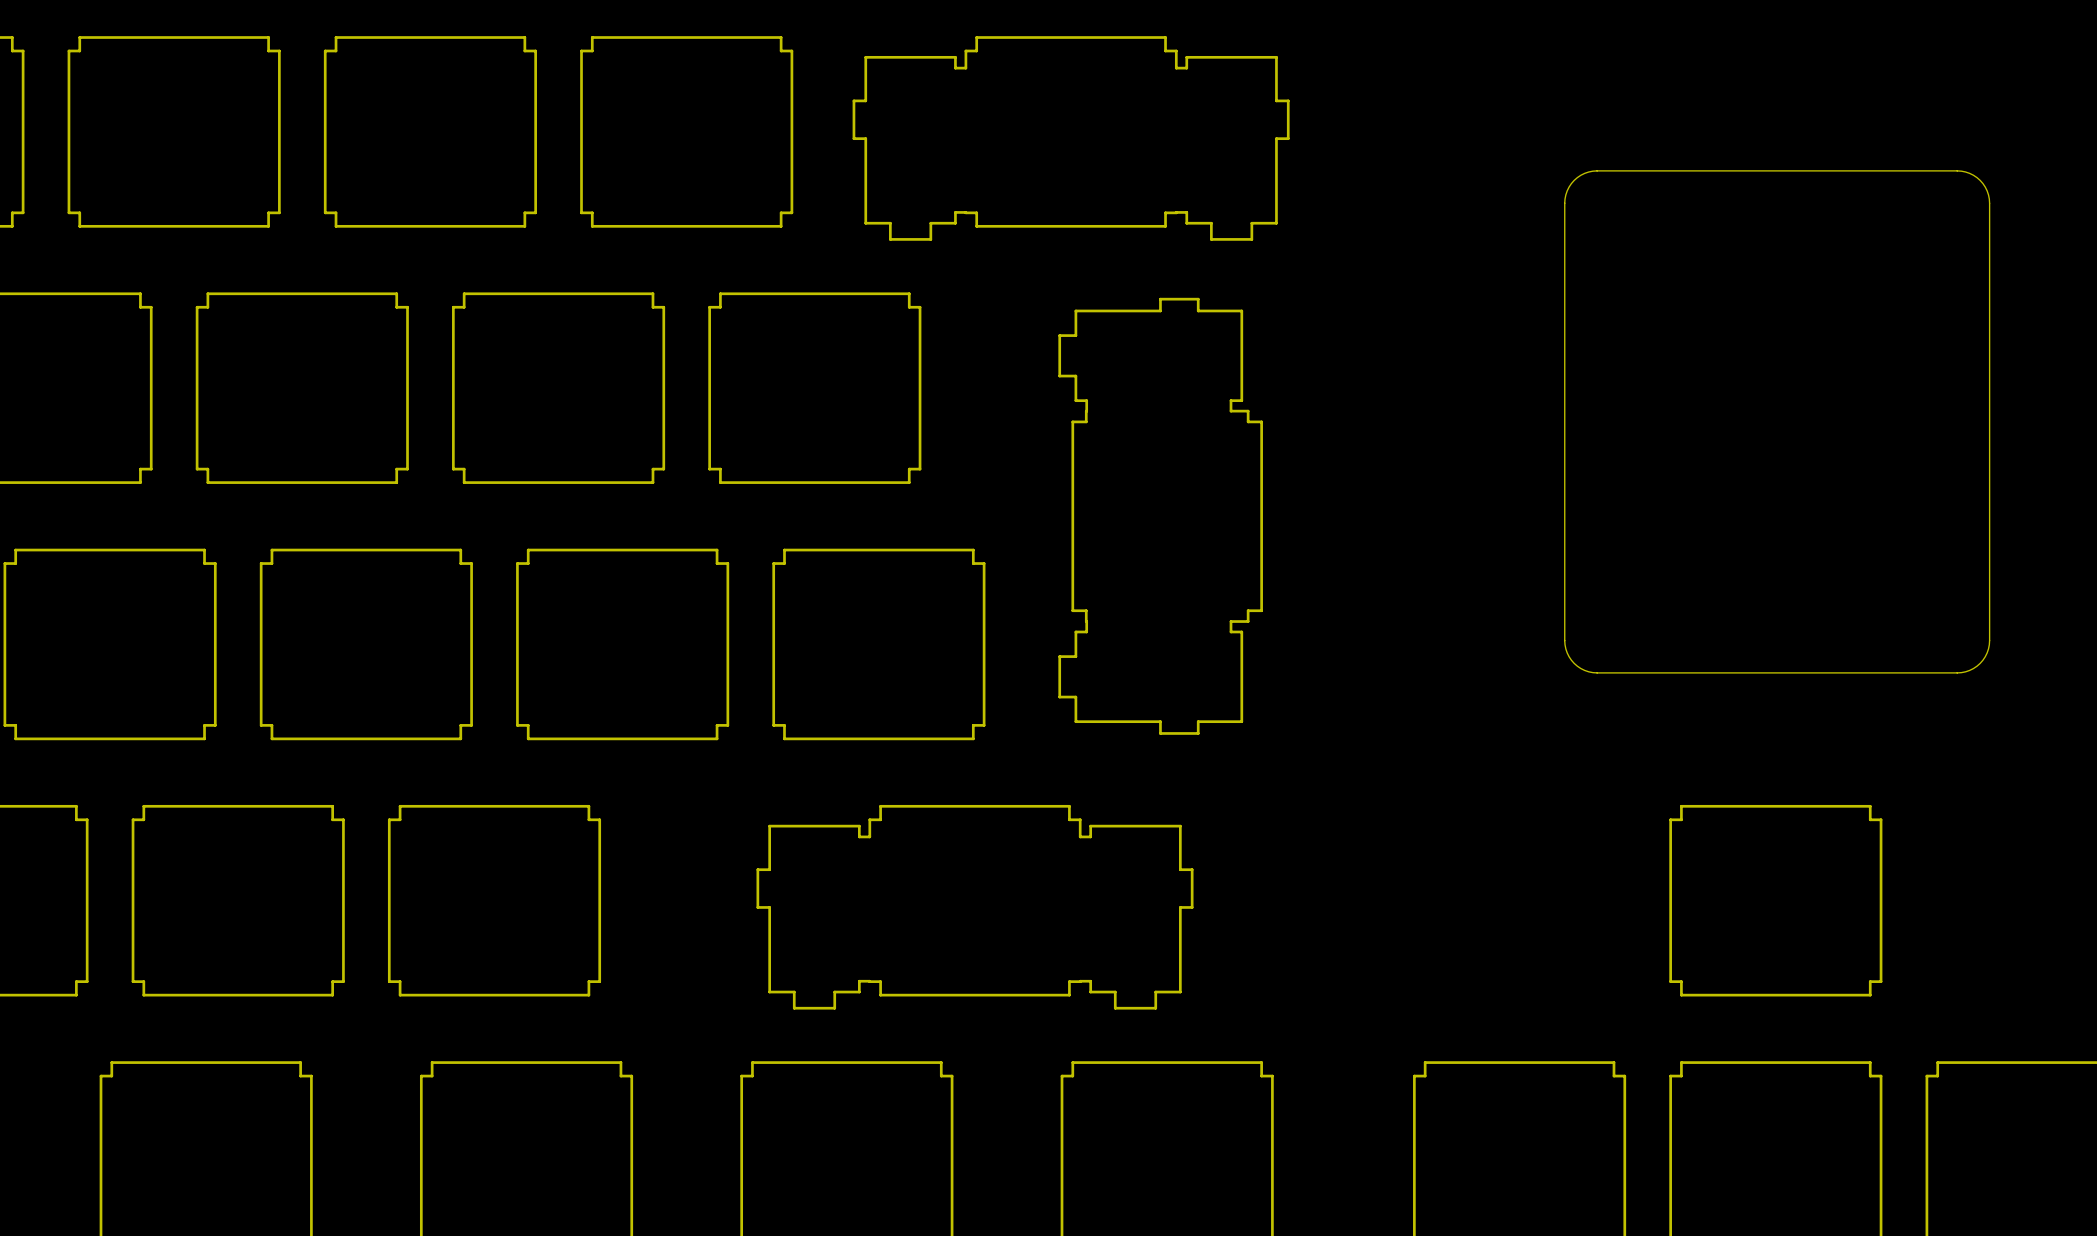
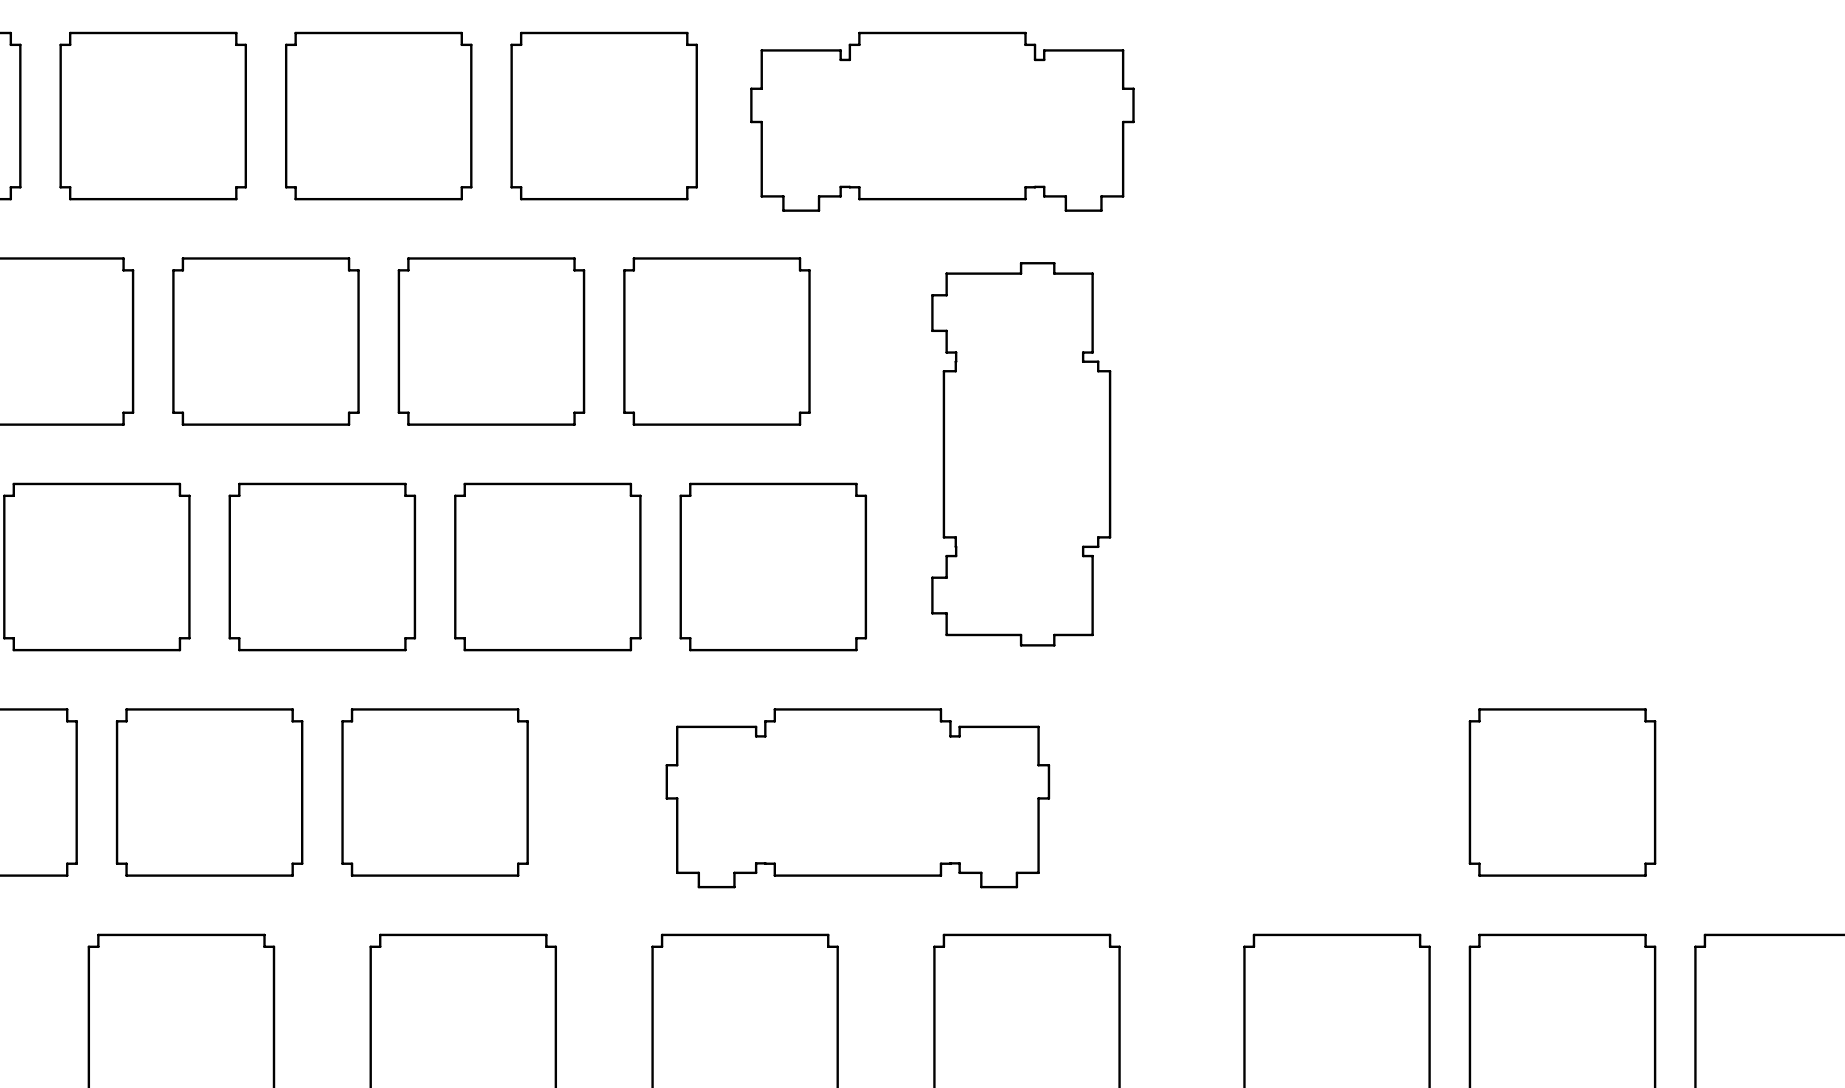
board edge: (1597, 170) (1957, 170) (1973, 175) (1982, 183) (1987, 190) (1989, 203) (1989, 640) (1985, 656) (1976, 666) (1969, 670) (1957, 672) (1597, 672) (1584, 670) (1571, 660) (1567, 652) (1564, 640) (1564, 203) (1567, 190) (1574, 180) (1584, 173) (1597, 170) -> none

